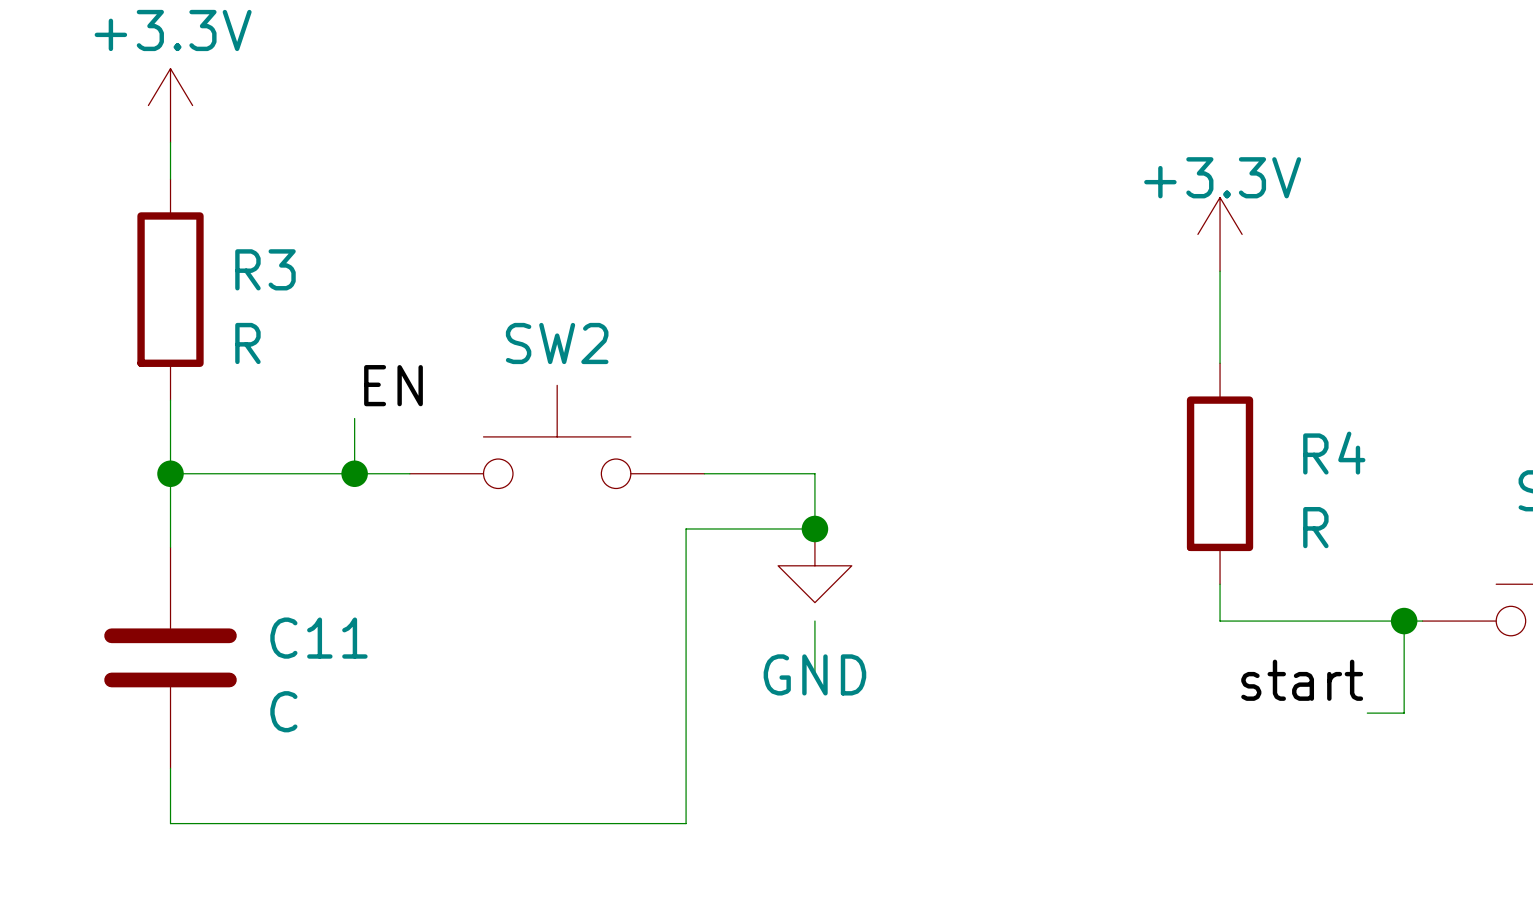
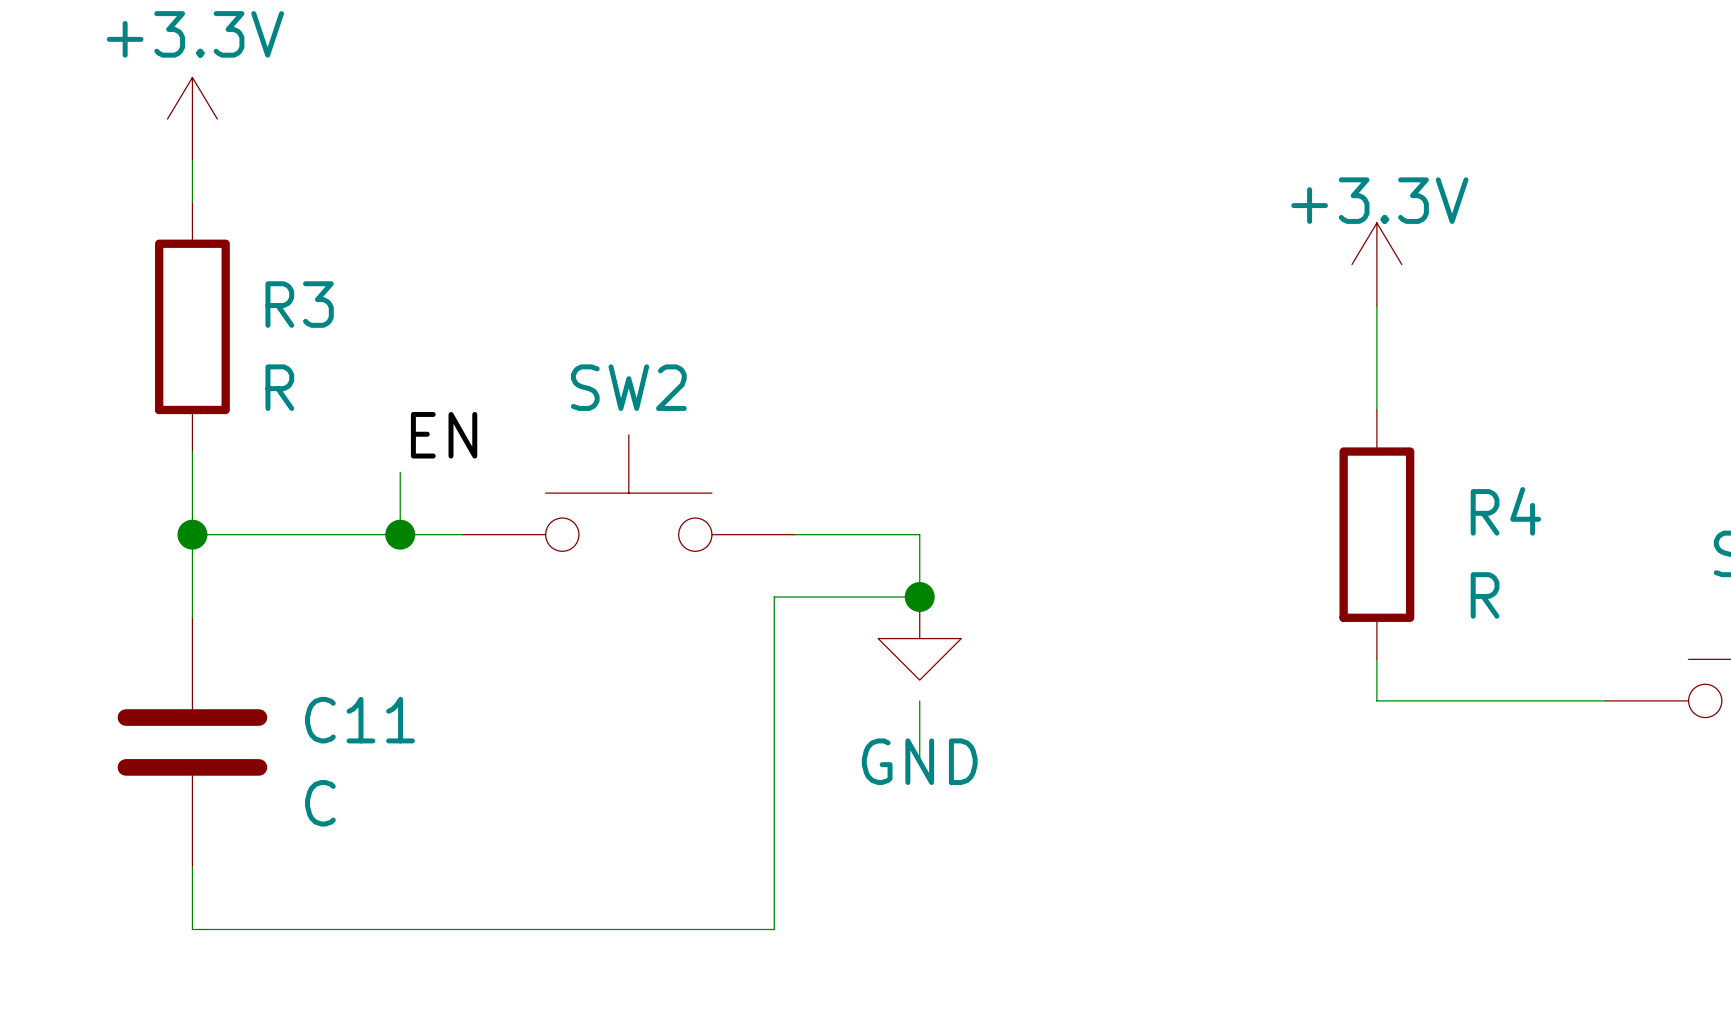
wire: (1404, 621) (1404, 713) (1367, 713) -> none
junction: (1404, 621) -> none
label: start (1302, 680) -> none

